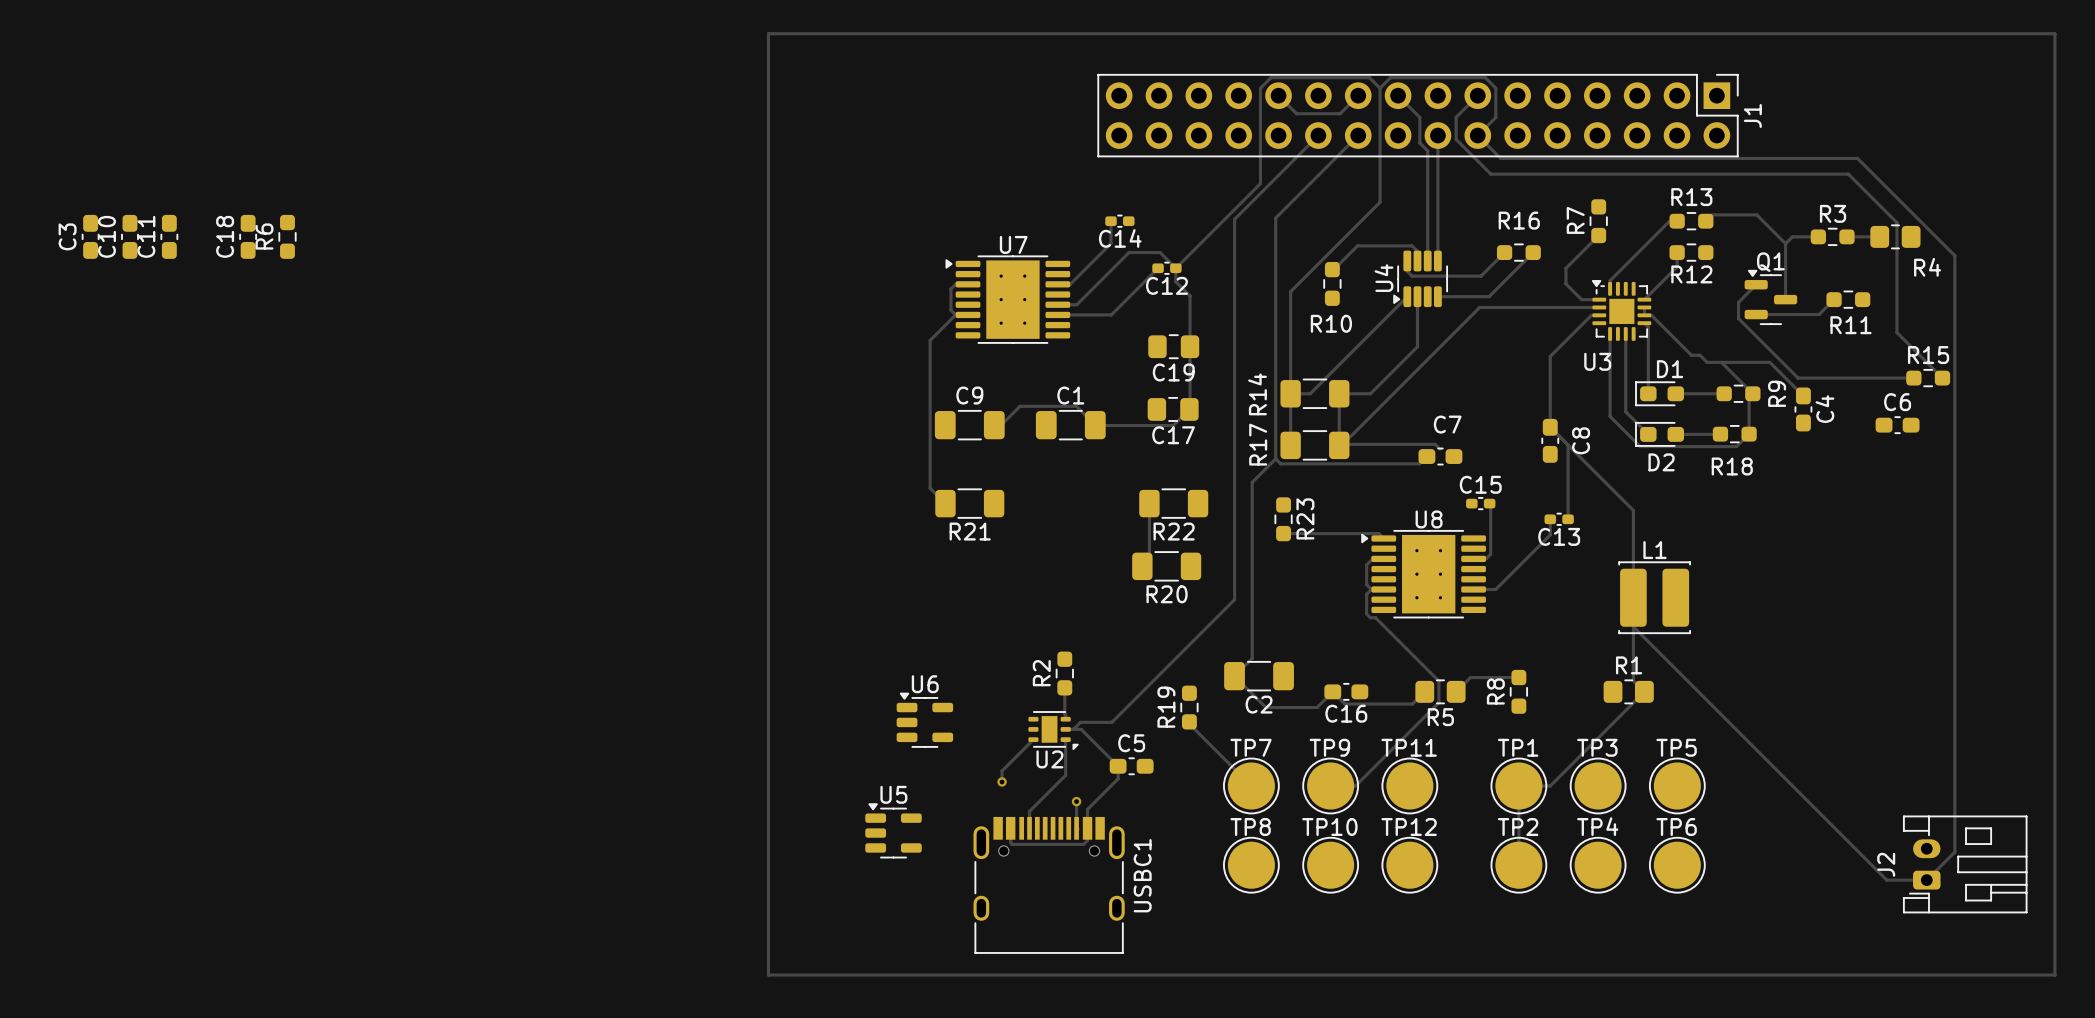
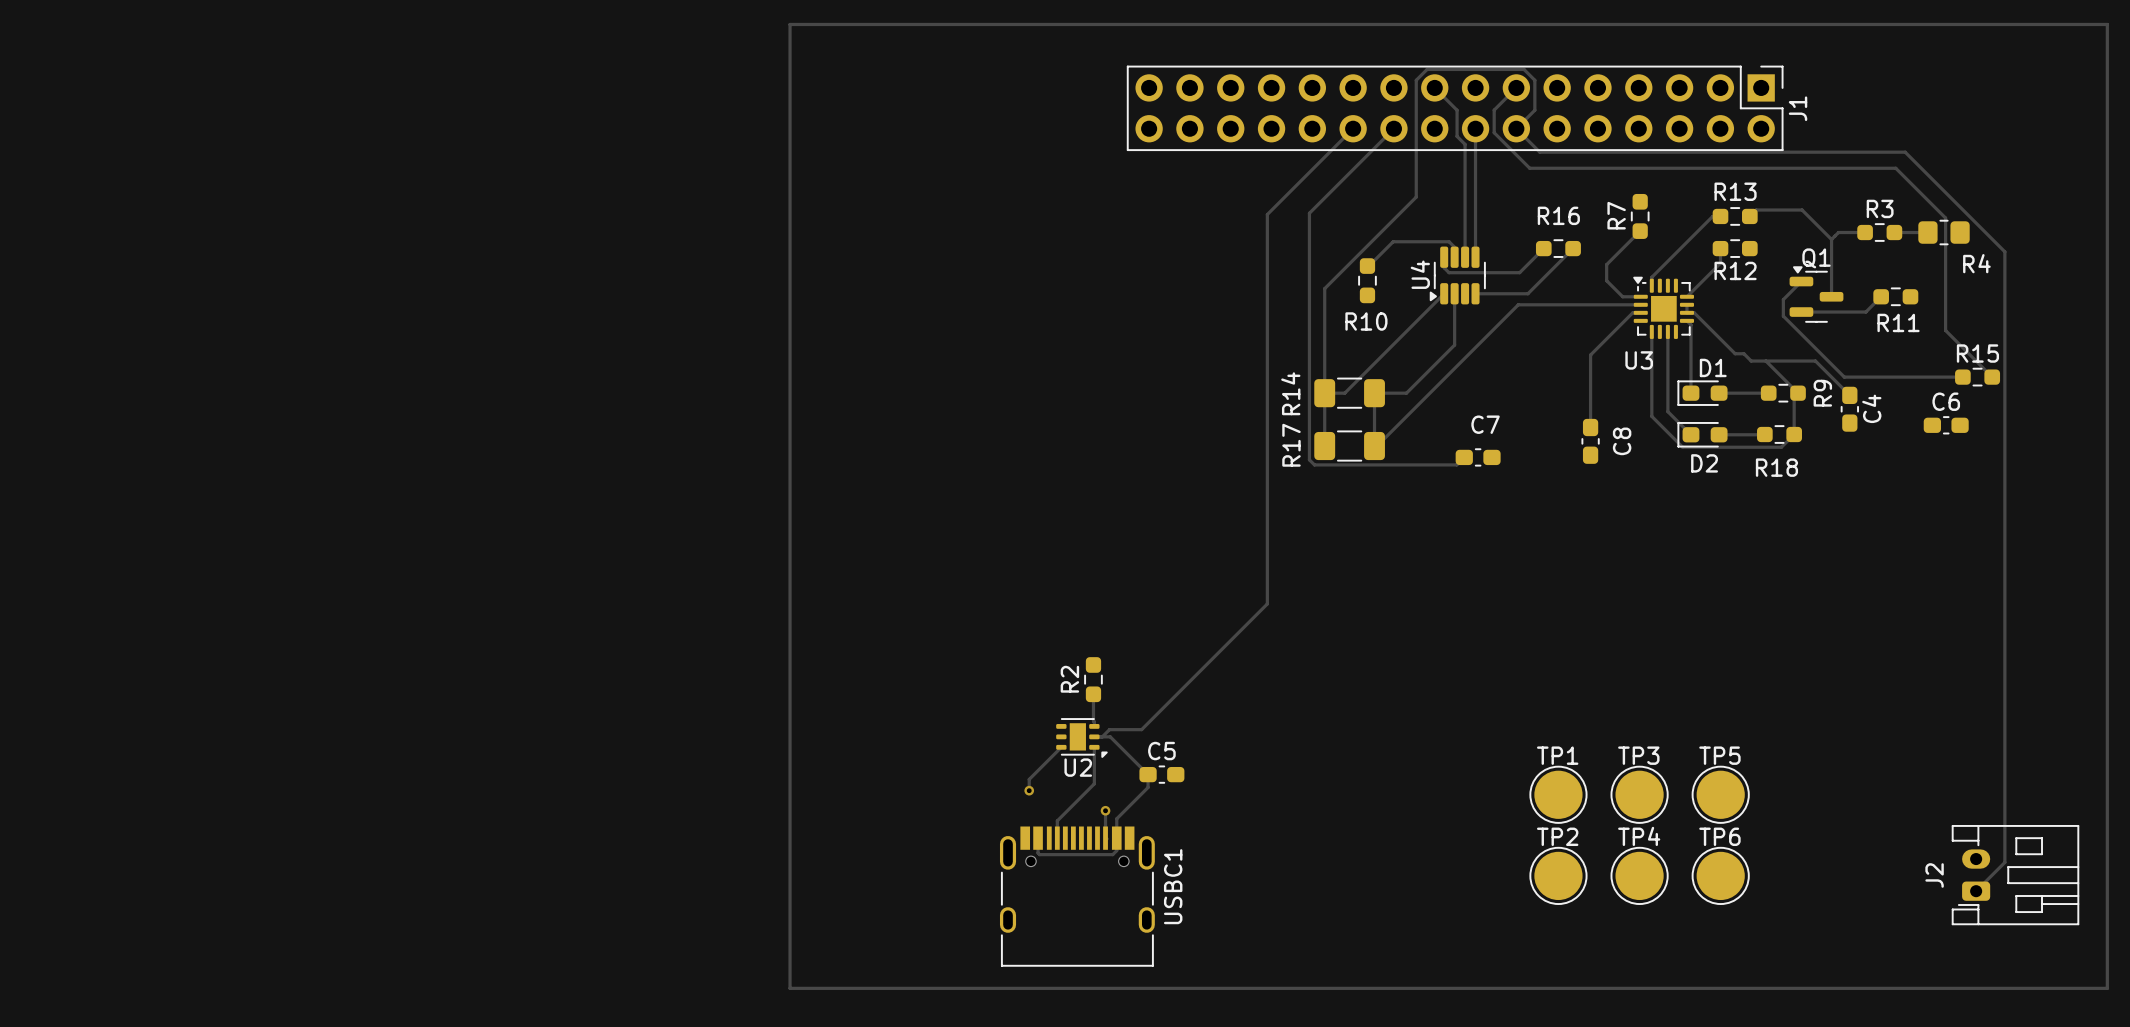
track: (1380, 88) (1369, 77) (1271, 77) (1260, 88) (1260, 183) (1175, 268) -> none
track: (1278, 95) (1296, 113) (1340, 113) (1358, 95) -> none
track: (1110, 221) (1110, 243) (1070, 284) (1057, 284) -> none
C14: (1119, 221) -> none
C3: (90, 236) -> none
C10: (129, 236) -> none
C11: (169, 236) -> none
C18: (248, 236) -> none
R6: (287, 236) -> none
track: (1158, 268) (1111, 314) (1057, 314) -> none
C12: (1166, 268) -> none
track: (1175, 268) (1160, 252) (1129, 252) (1076, 304) (1057, 304) -> none
track: (1175, 268) (1175, 281) (1190, 295) (1190, 408) (1173, 425) (1095, 425) (1076, 406) (1020, 406) (1001, 425) (994, 425) -> none
track: (968, 284) (955, 284) (950, 289) (950, 310) (955, 314) -> none
U7: (1007, 299) -> none
track: (955, 314) (930, 340) (930, 488) (945, 503) -> none
C19: (1173, 346) -> none
C17: (1173, 409) -> none
C9: (969, 425) -> none
C1: (1070, 425) -> none
track: (1550, 427) (1633, 510) (1633, 680) (1644, 691) (1550, 785) (1518, 785) (1518, 865) -> none
track: (1339, 445) (1435, 444) (1440, 449) -> none
track: (1568, 445) (1568, 519) -> none
track: (1275, 458) (1252, 482) (1252, 658) (1234, 676) (1265, 707) (1317, 707) (1332, 691) (1344, 704) (1412, 704) (1424, 691) -> none
R21: (969, 503) -> none
track: (1149, 503) (1149, 559) (1142, 566) -> none
R22: (1173, 503) -> none
C15: (1480, 503) -> none
track: (1489, 503) (1490, 554) (1485, 558) (1473, 558) -> none
R23: (1283, 519) -> none
track: (1550, 519) (1550, 534) (1495, 589) (1473, 589) -> none
C13: (1559, 519) -> none
track: (1283, 533) (1378, 533) (1383, 538) -> none
track: (1383, 558) (1372, 558) (1366, 564) (1366, 584) (1371, 589) -> none
R20: (1166, 566) -> none
U8: (1423, 574) -> none
track: (1371, 589) (1366, 594) (1366, 614) (1370, 617) (1375, 617) (1438, 681) (1438, 702) (1355, 785) (1330, 785) -> none
L1: (1654, 597) -> none
track: (1633, 626) (1886, 880) (1926, 880) -> none
C2: (1259, 676) -> none
track: (1518, 677) (1470, 677) (1456, 691) -> none
C16: (1346, 691) -> none
R5: (1440, 691) -> none
R8: (1518, 691) -> none
R1: (1628, 691) -> none
R19: (1189, 707) -> none
U6: (924, 720) -> none
track: (1189, 721) (1251, 785) -> none
TP7: (1251, 785) -> none
TP9: (1330, 785) -> none
TP11: (1409, 785) -> none
U5: (893, 830) -> none
TP8: (1251, 865) -> none
TP10: (1330, 865) -> none
TP12: (1409, 865) -> none

